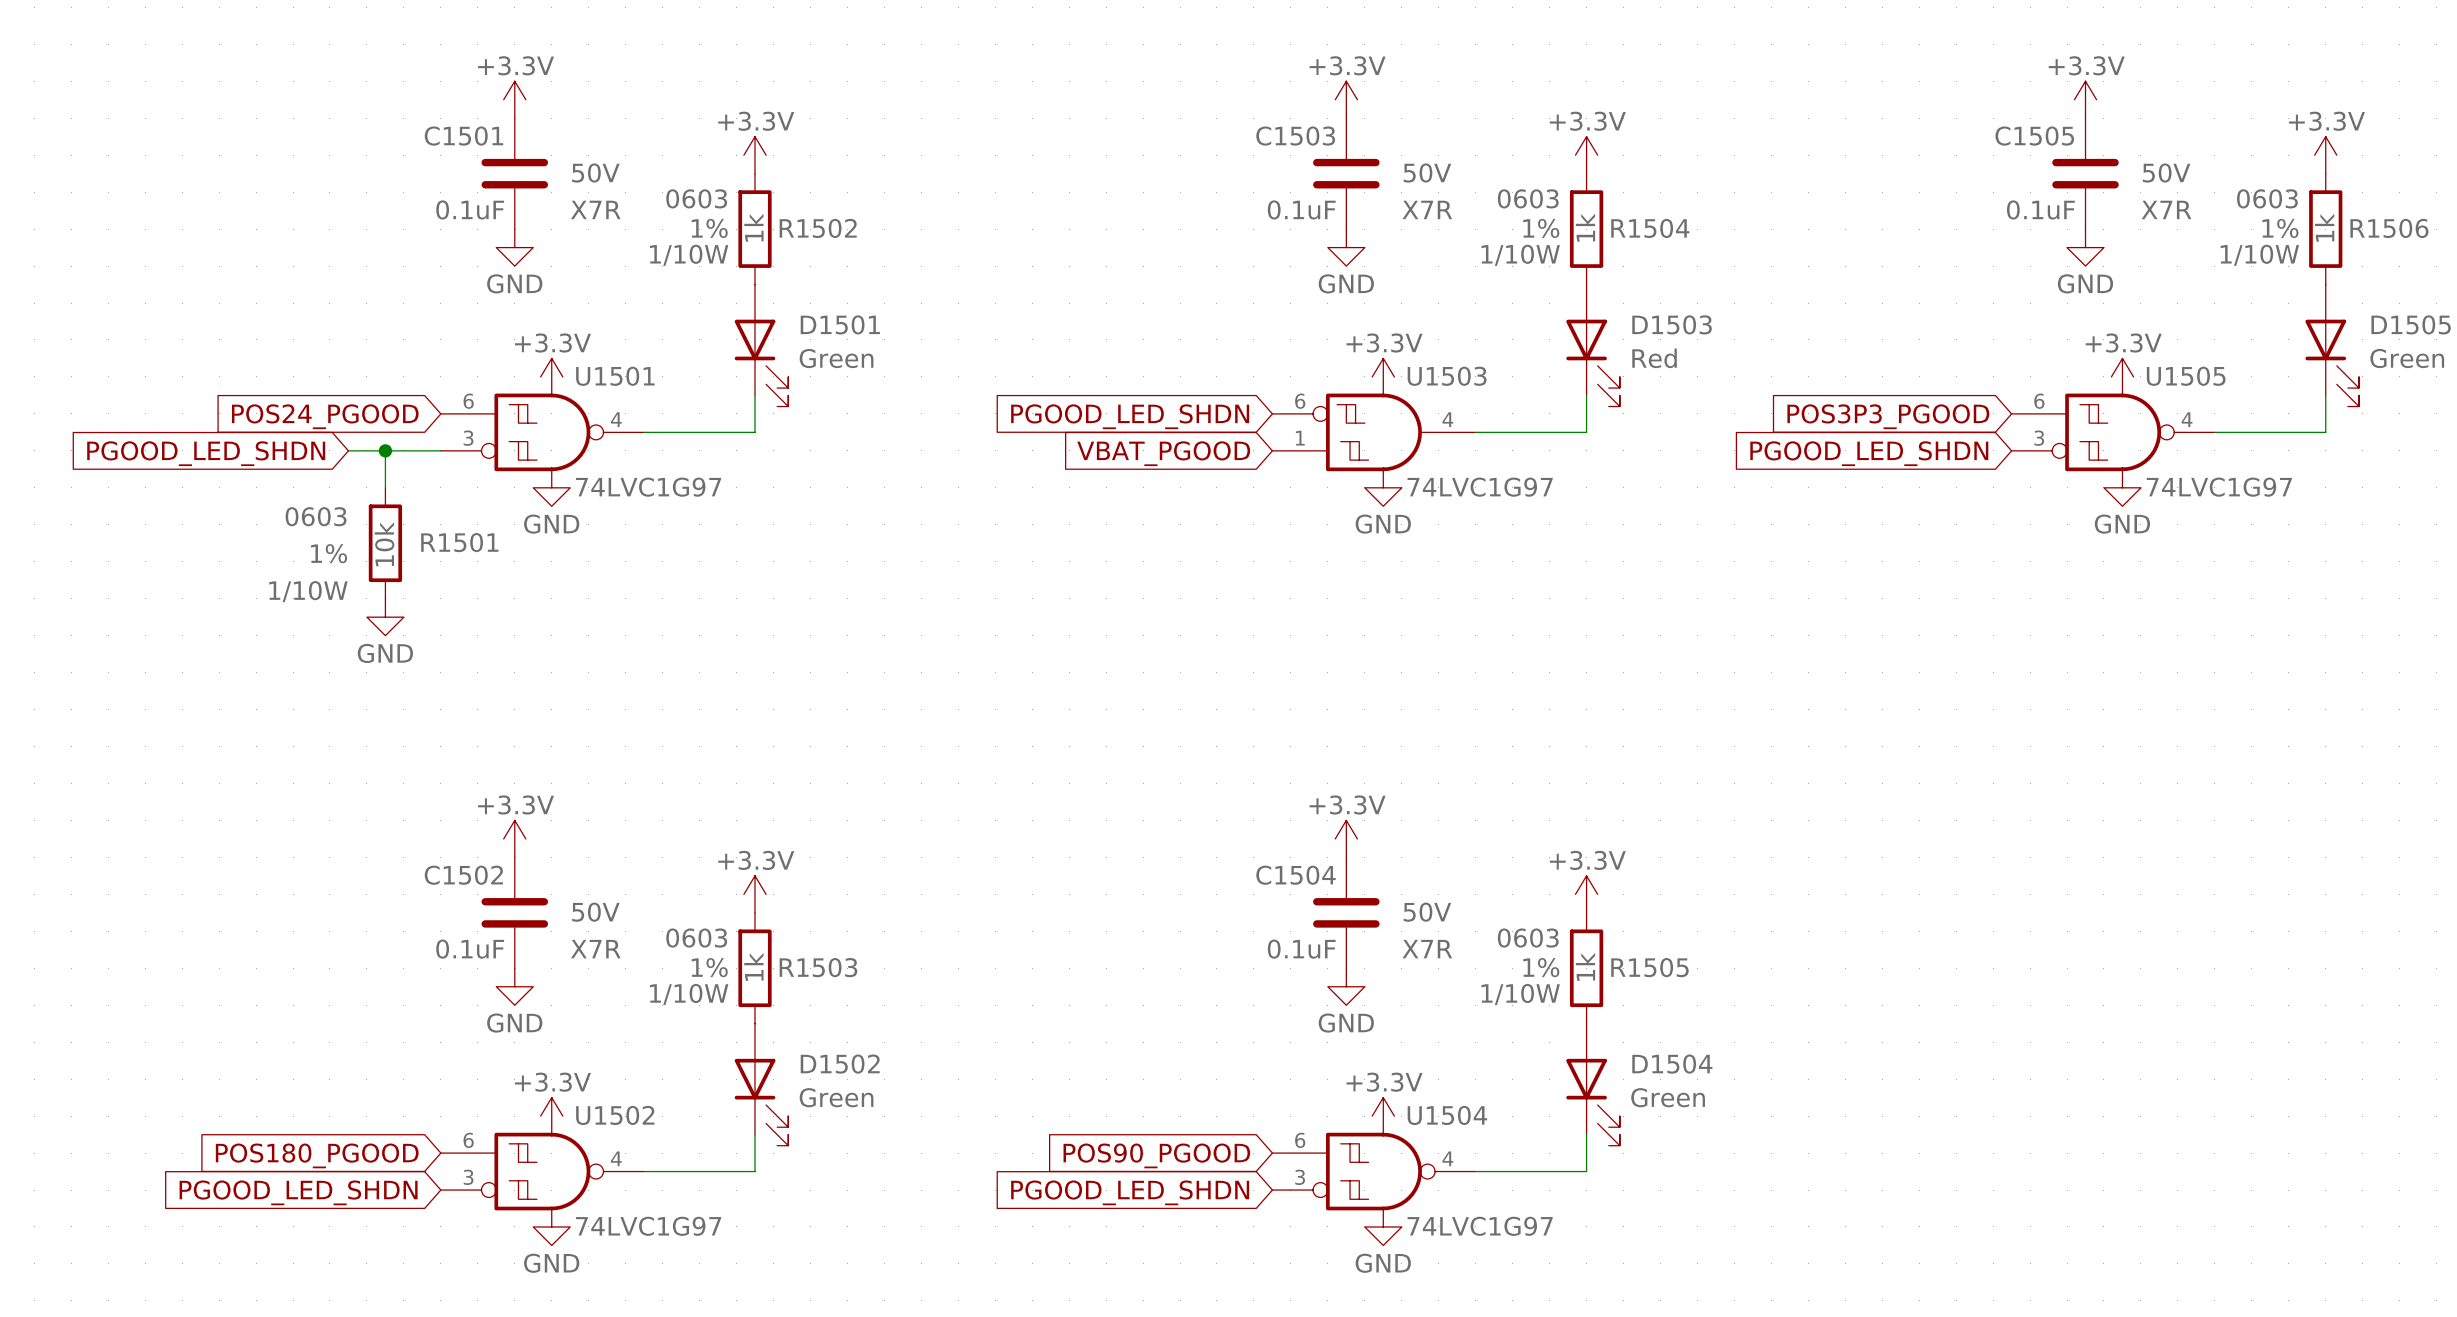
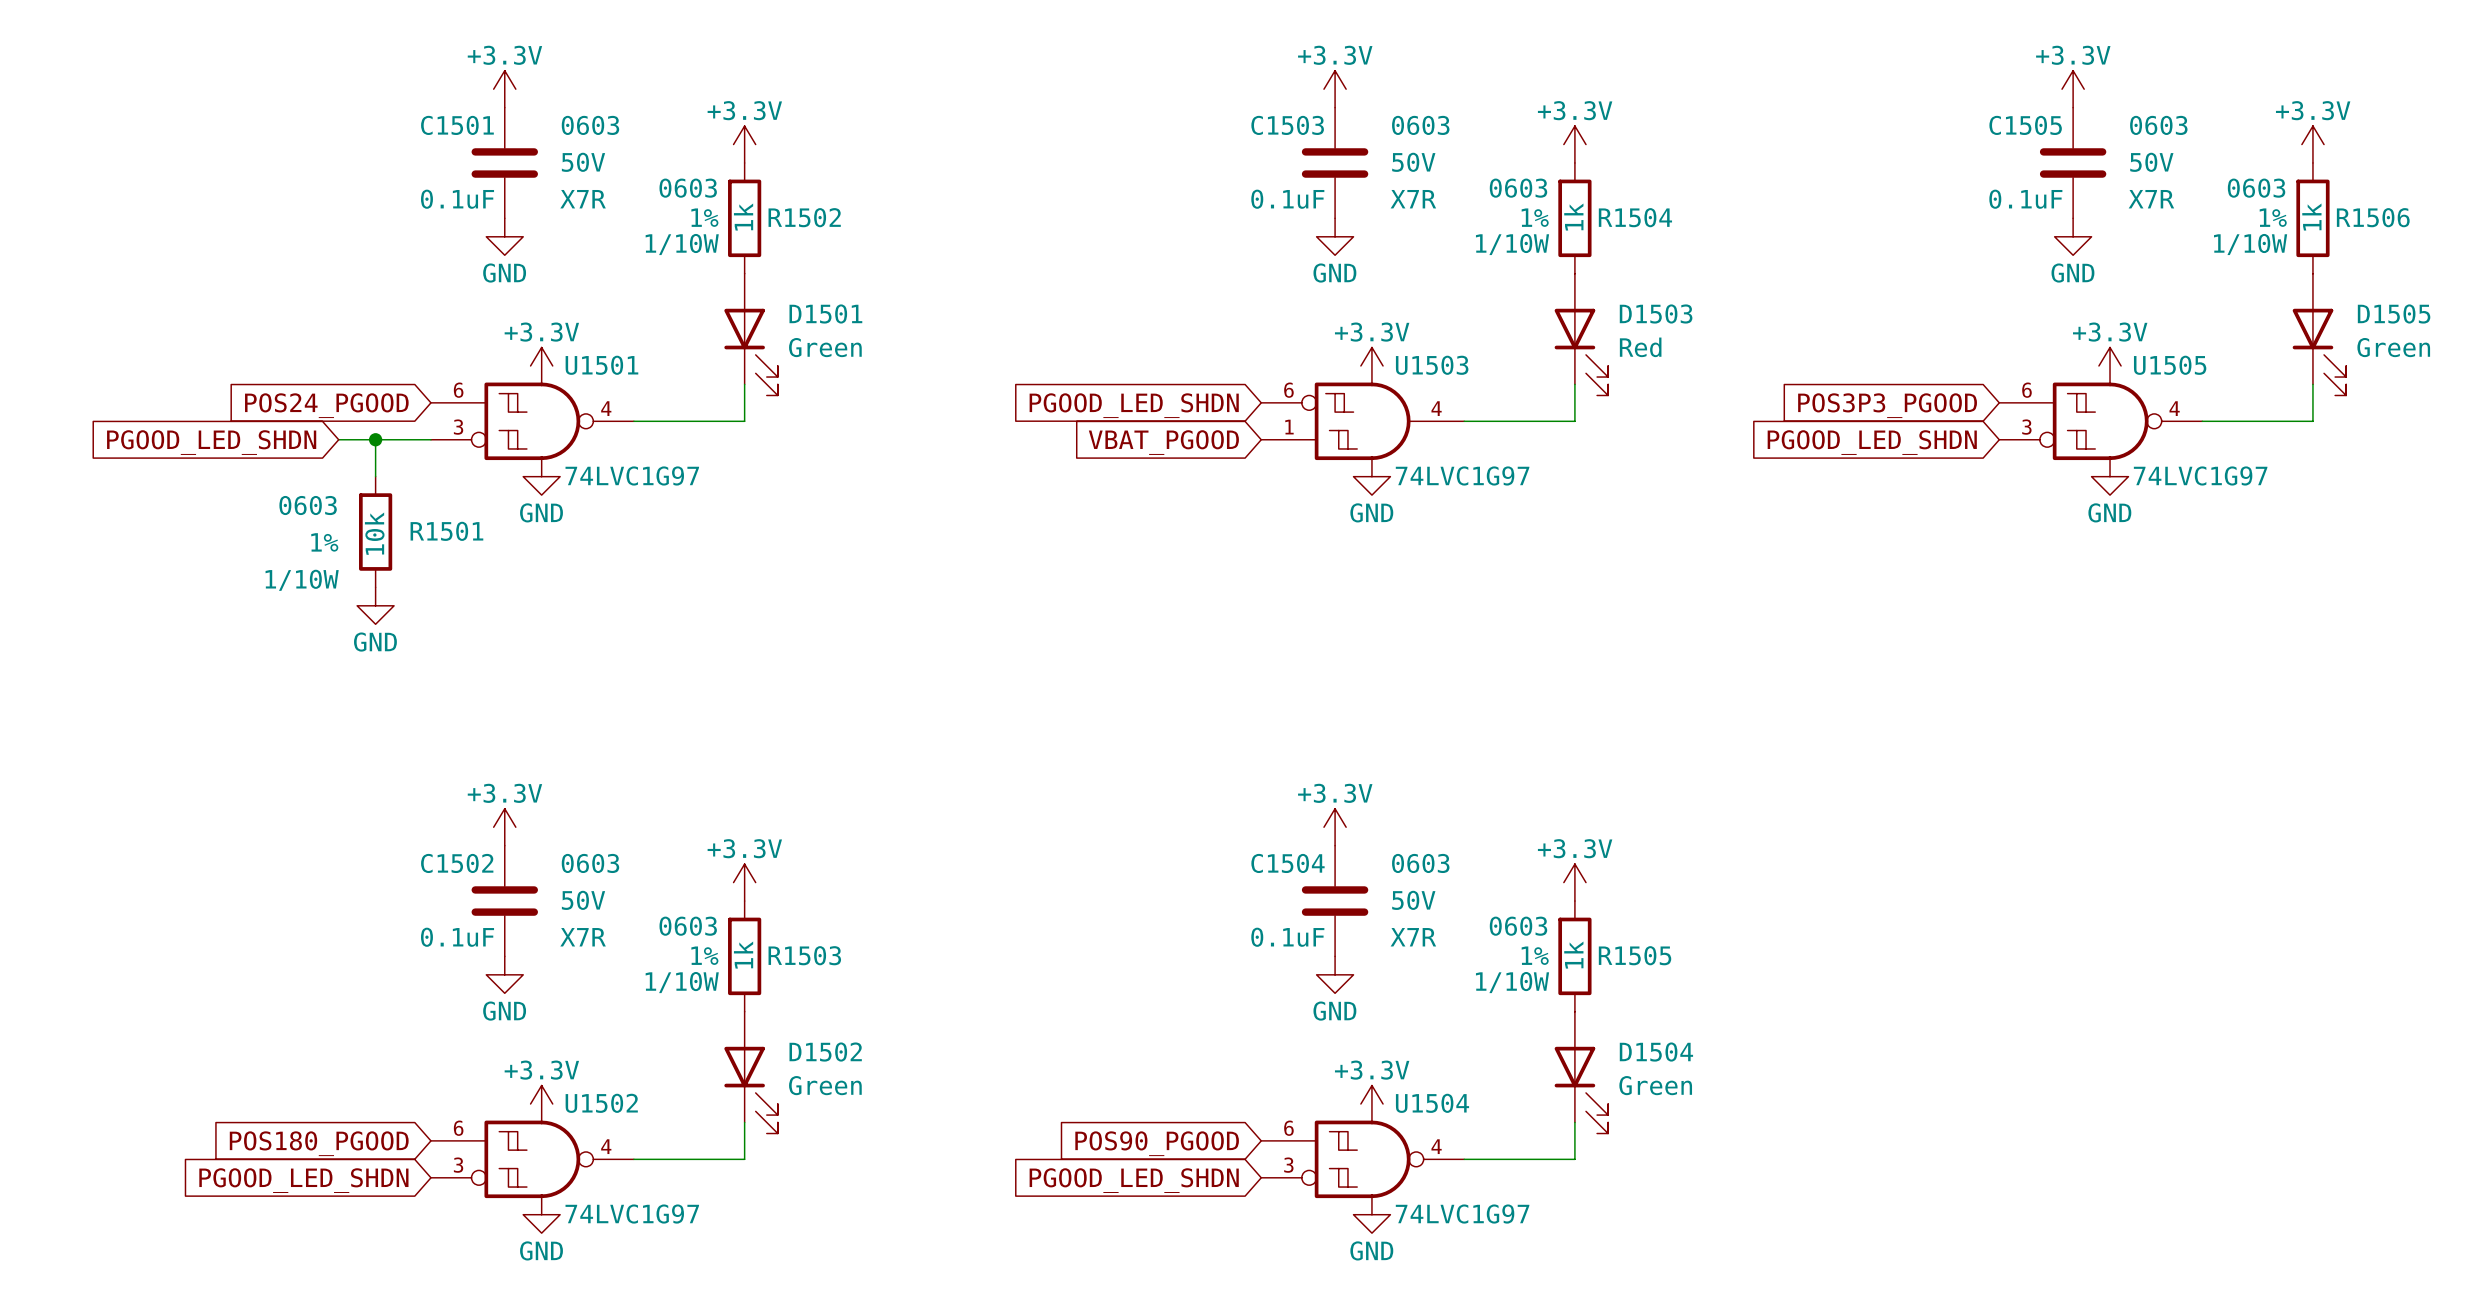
C1501 text: none -> 0603 (590, 125)
C1503 text: none -> 0603 (1420, 125)
C1505 text: none -> 0603 (2158, 125)
C1502 text: none -> 0603 (590, 863)
C1504 text: none -> 0603 (1420, 863)

